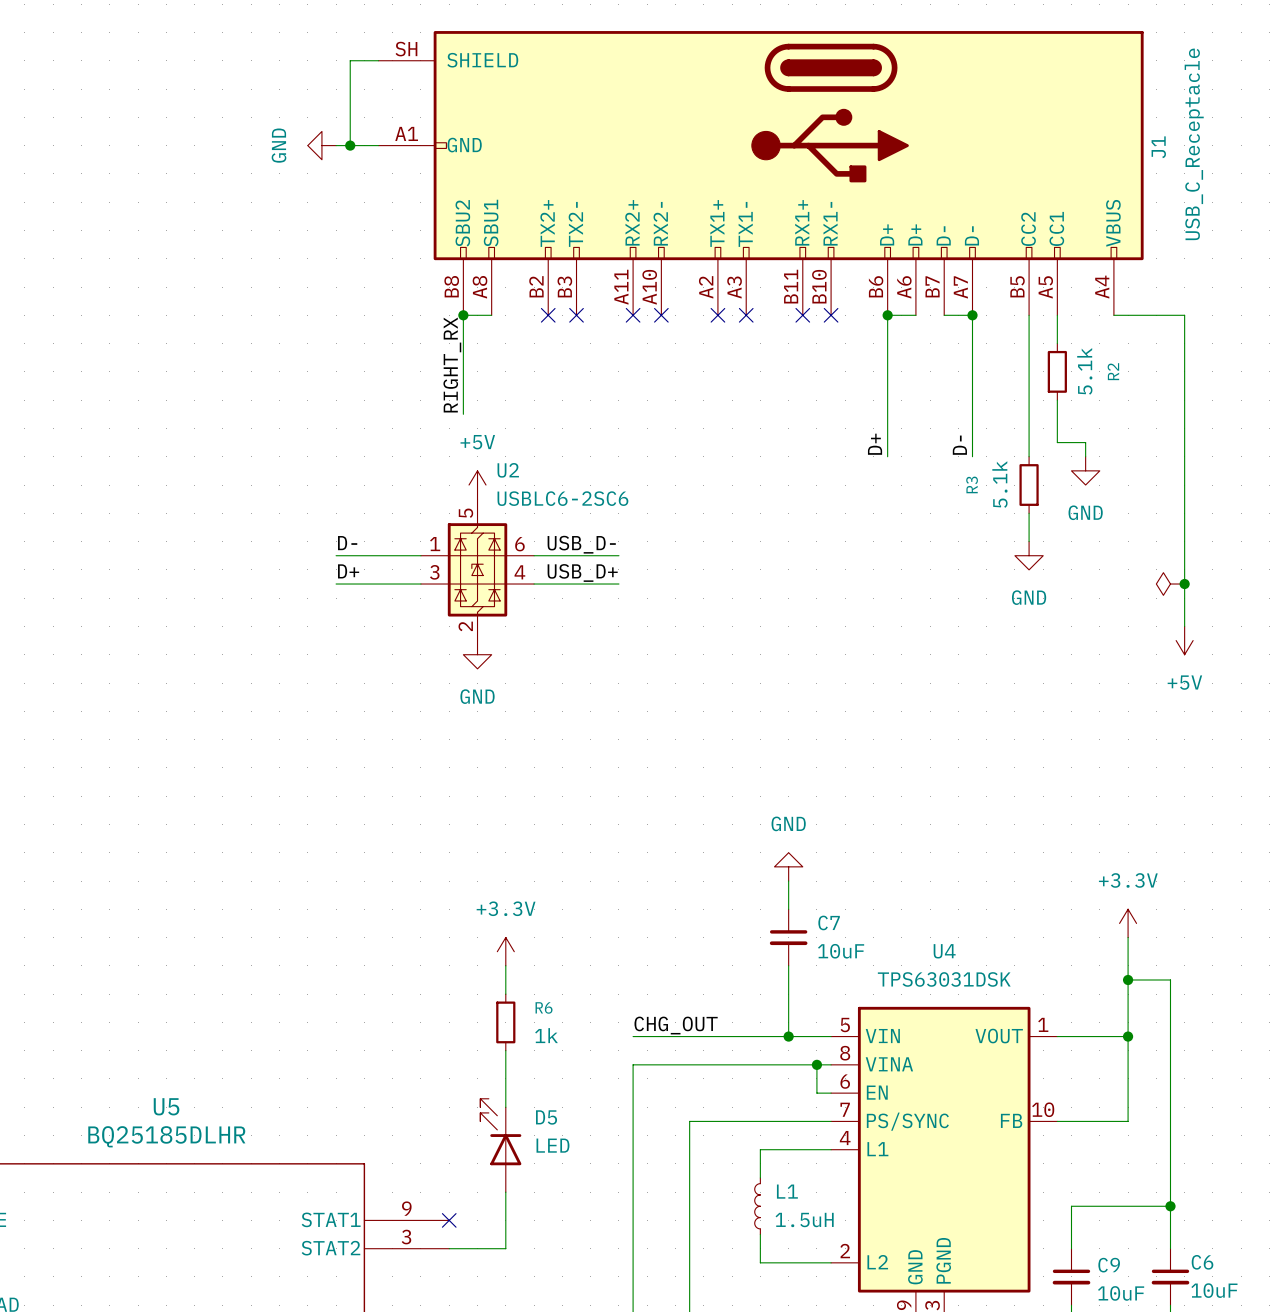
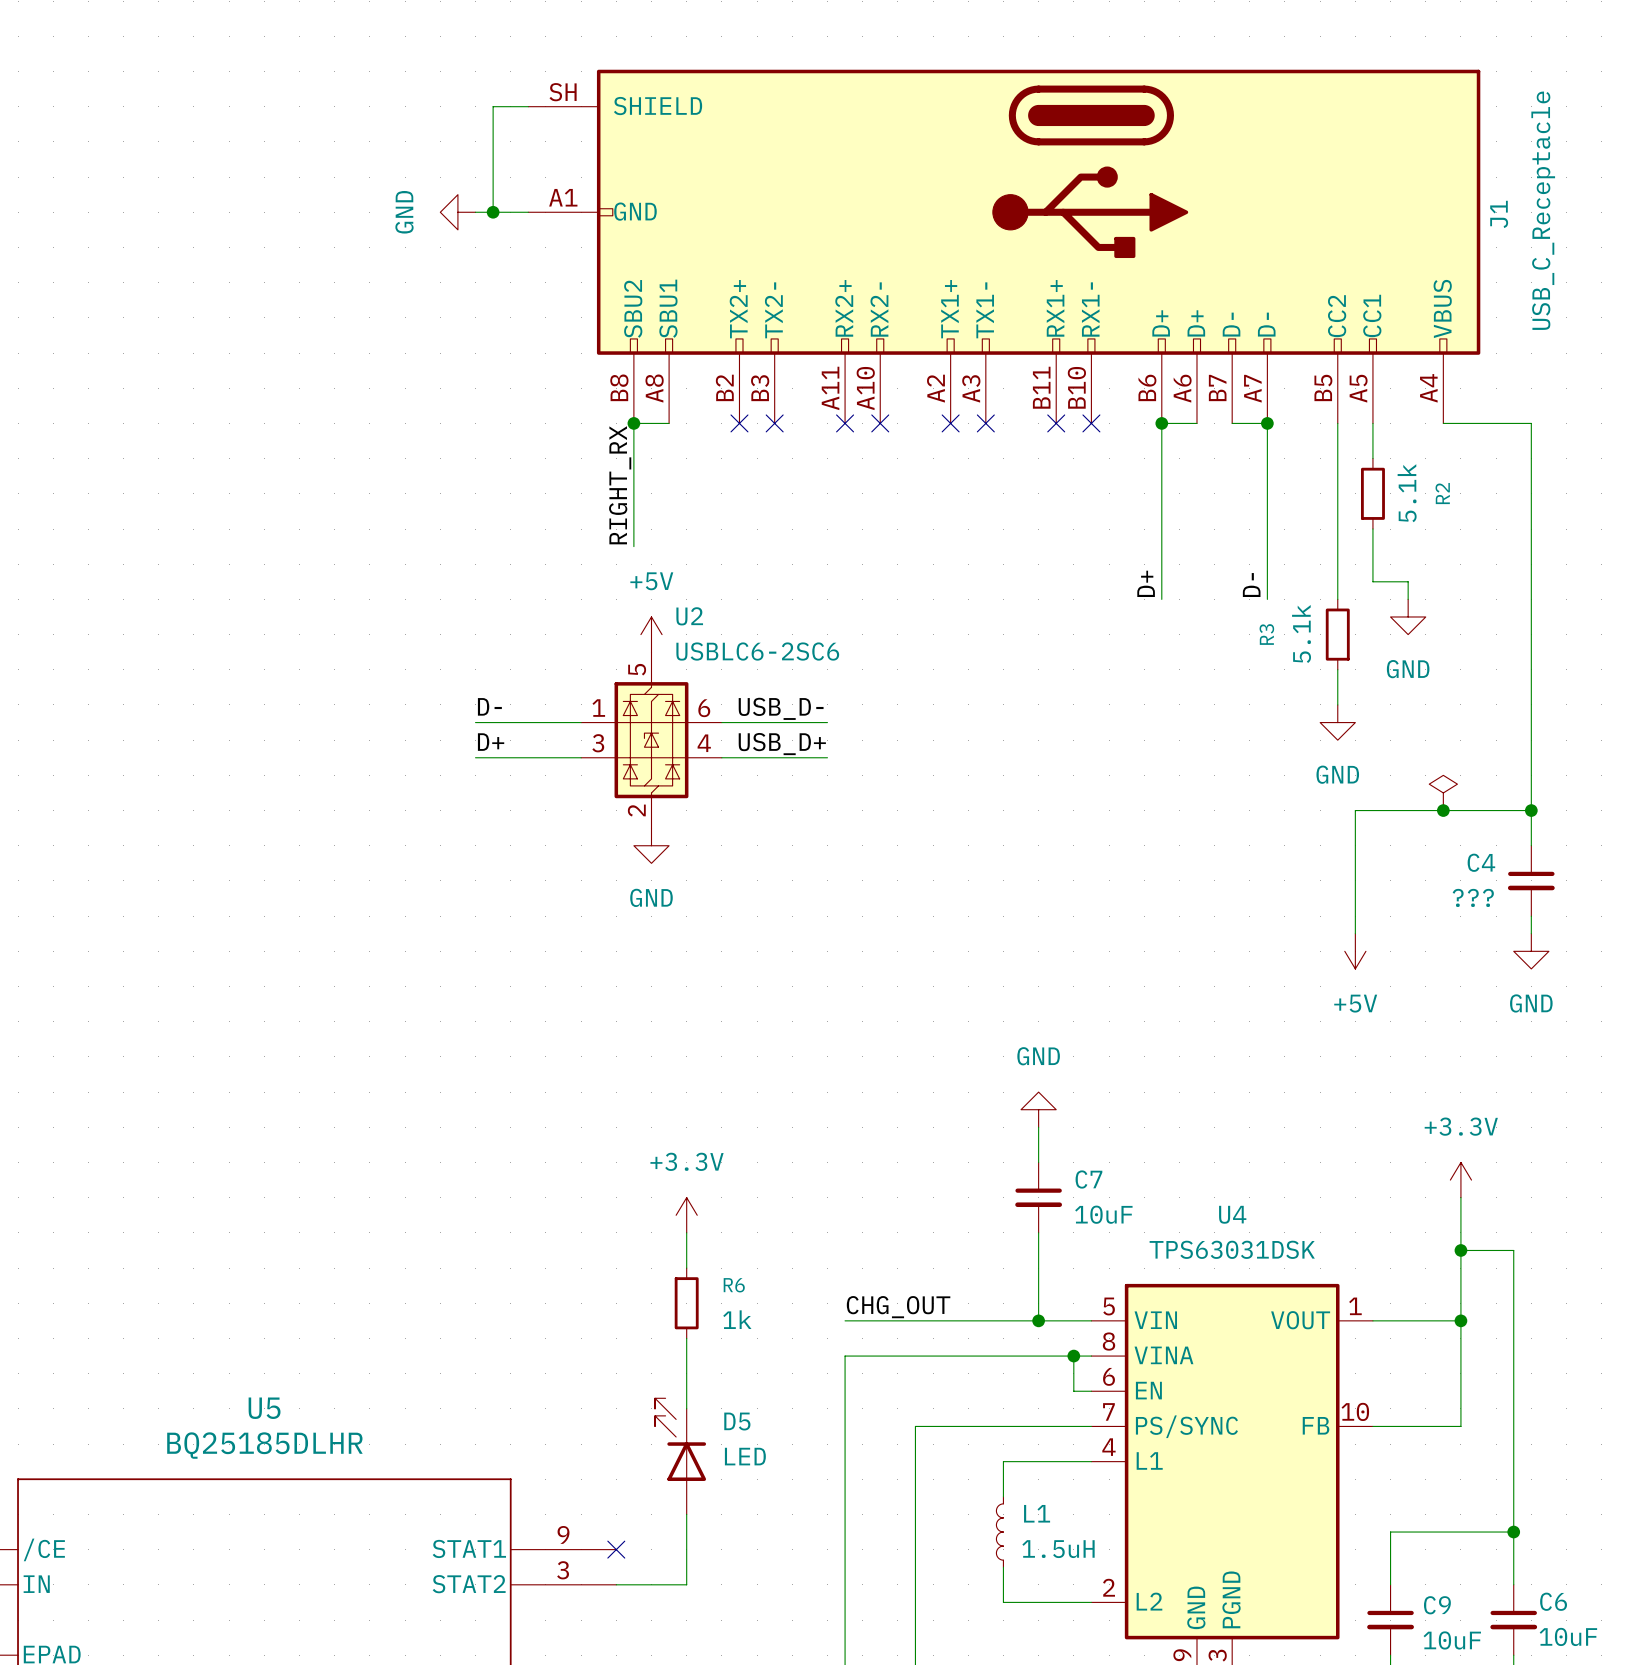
power symbol rotation: 0° (1170, 584) -> 90° clockwise (1443, 792)
power symbol position: (1170, 584) -> (1443, 792)
junction: (1184, 584) -> none
junction: none -> (1443, 810)
junction: none -> (1531, 810)
power symbol position: +5V (1184, 640) -> +5V (1355, 951)
wire: none -> (1531, 845) (1531, 810) (1355, 810) (1355, 933)
C4: none -> ??? (1531, 880)
wire: none -> (1531, 916) (1531, 933)
power symbol: none -> GND (1531, 951)

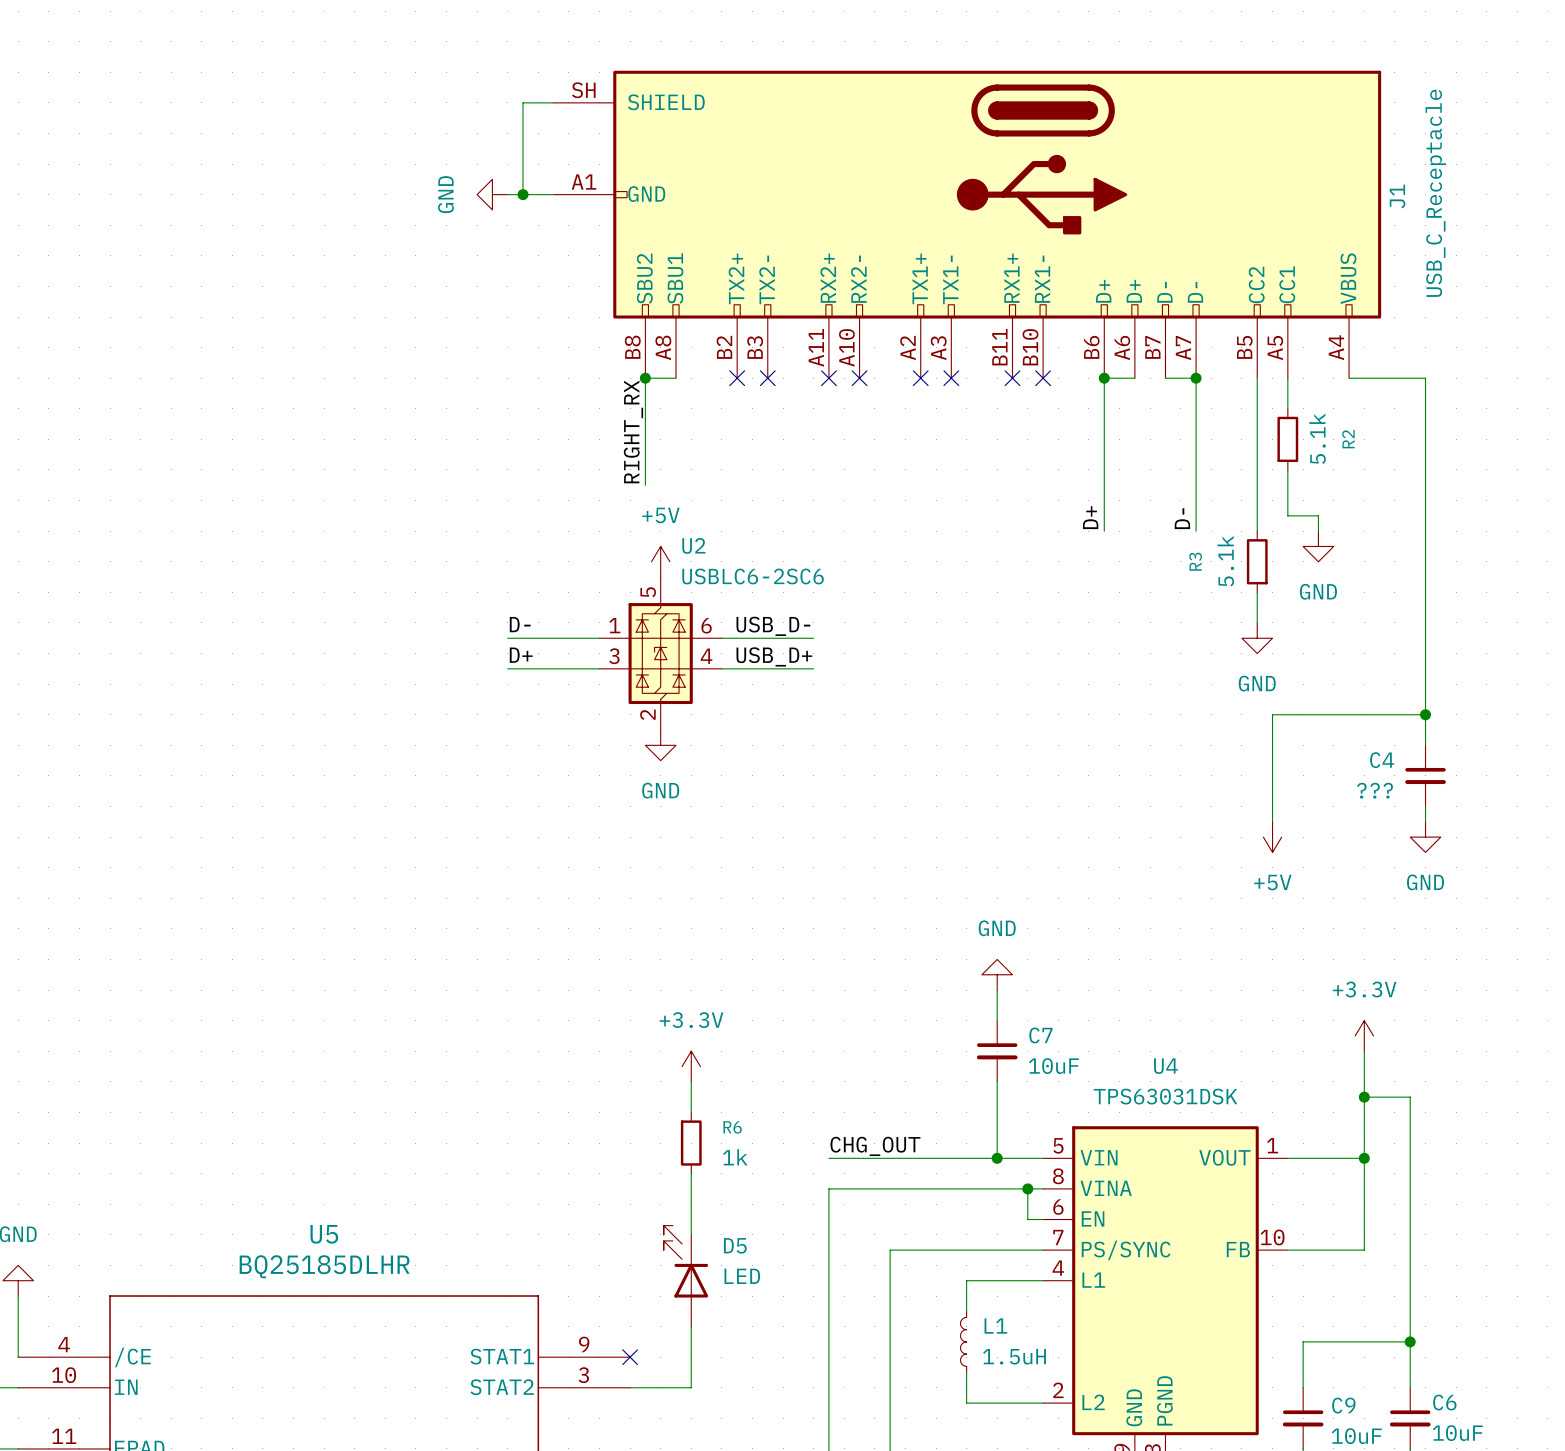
power symbol: (1443, 792) -> none
junction: (1443, 810) -> none

